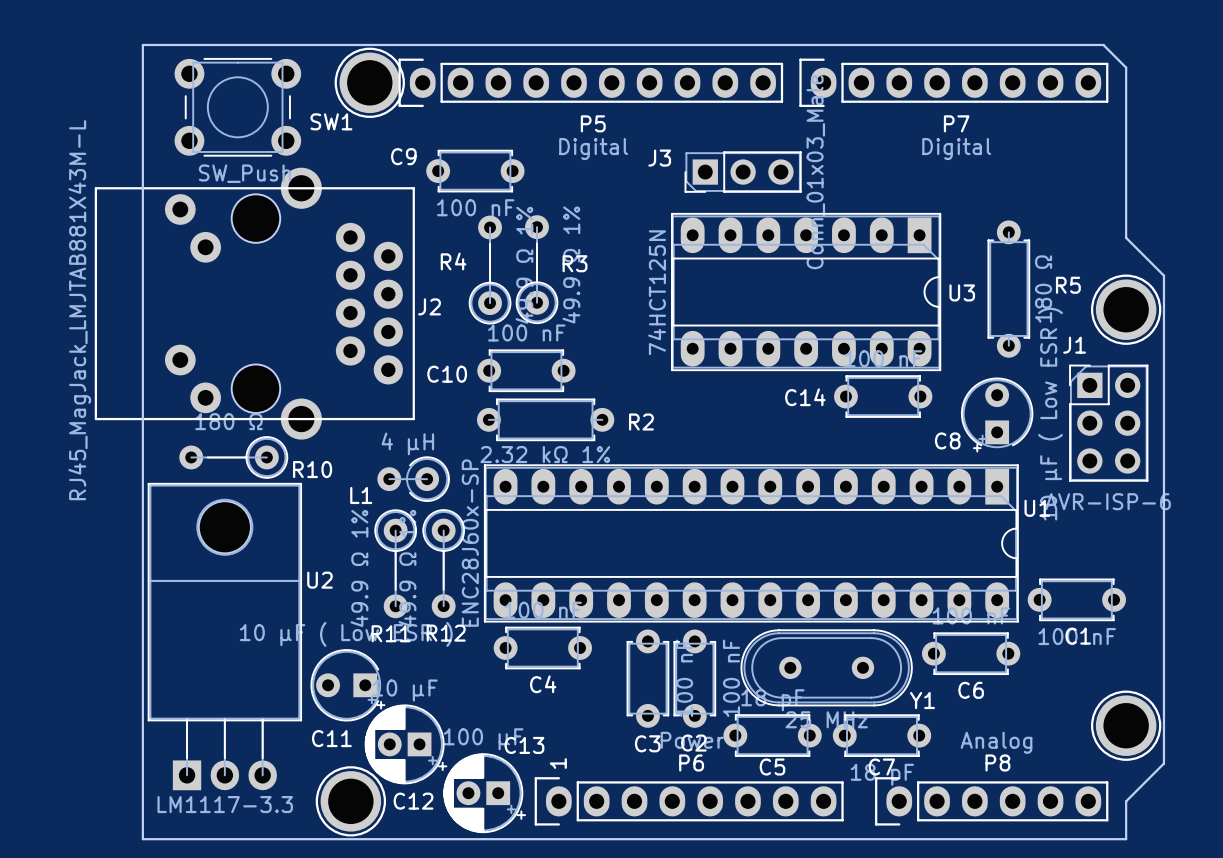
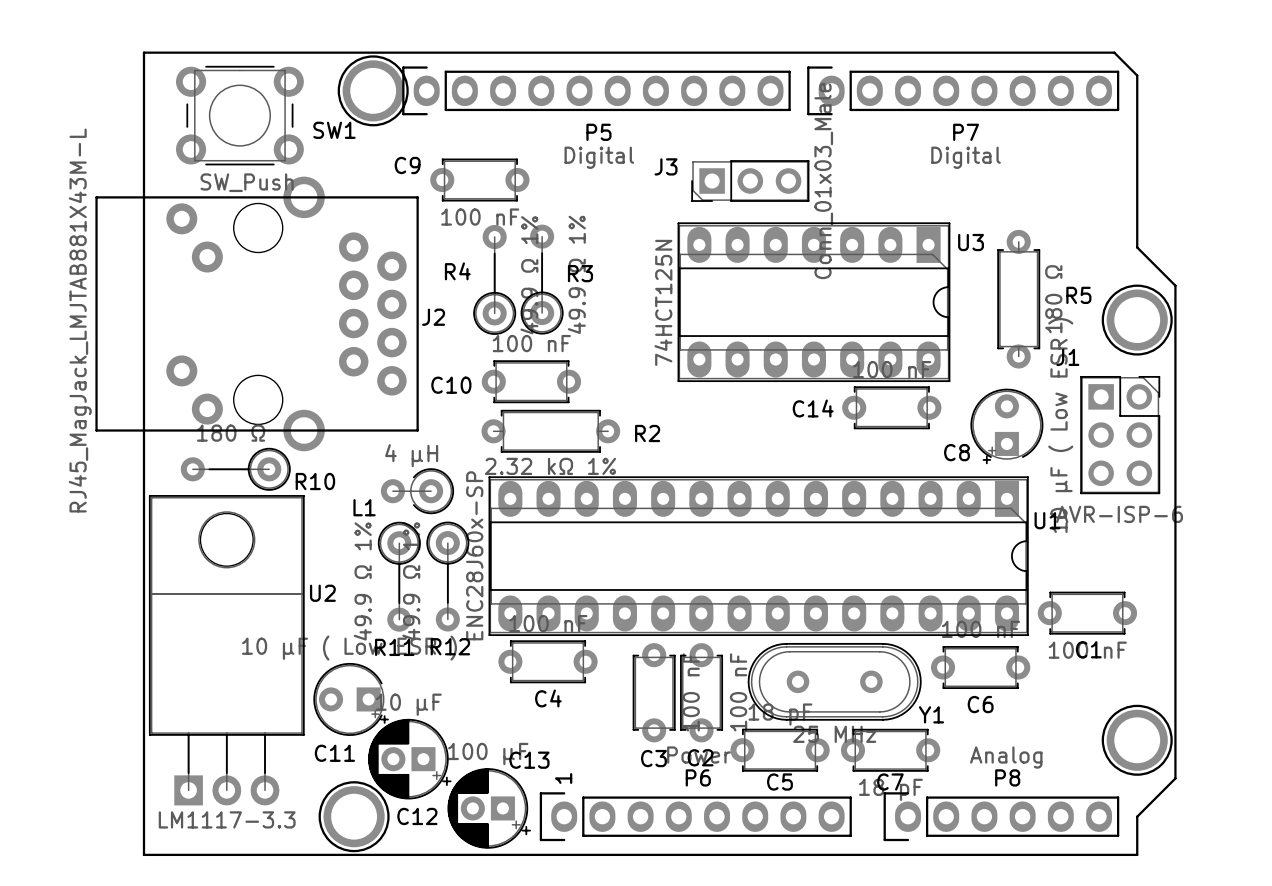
U3 name position: U3 (962, 292) -> U3 (971, 242)
J1 footprint: [1069, 364, 1149, 482] -> [1080, 375, 1161, 495]

